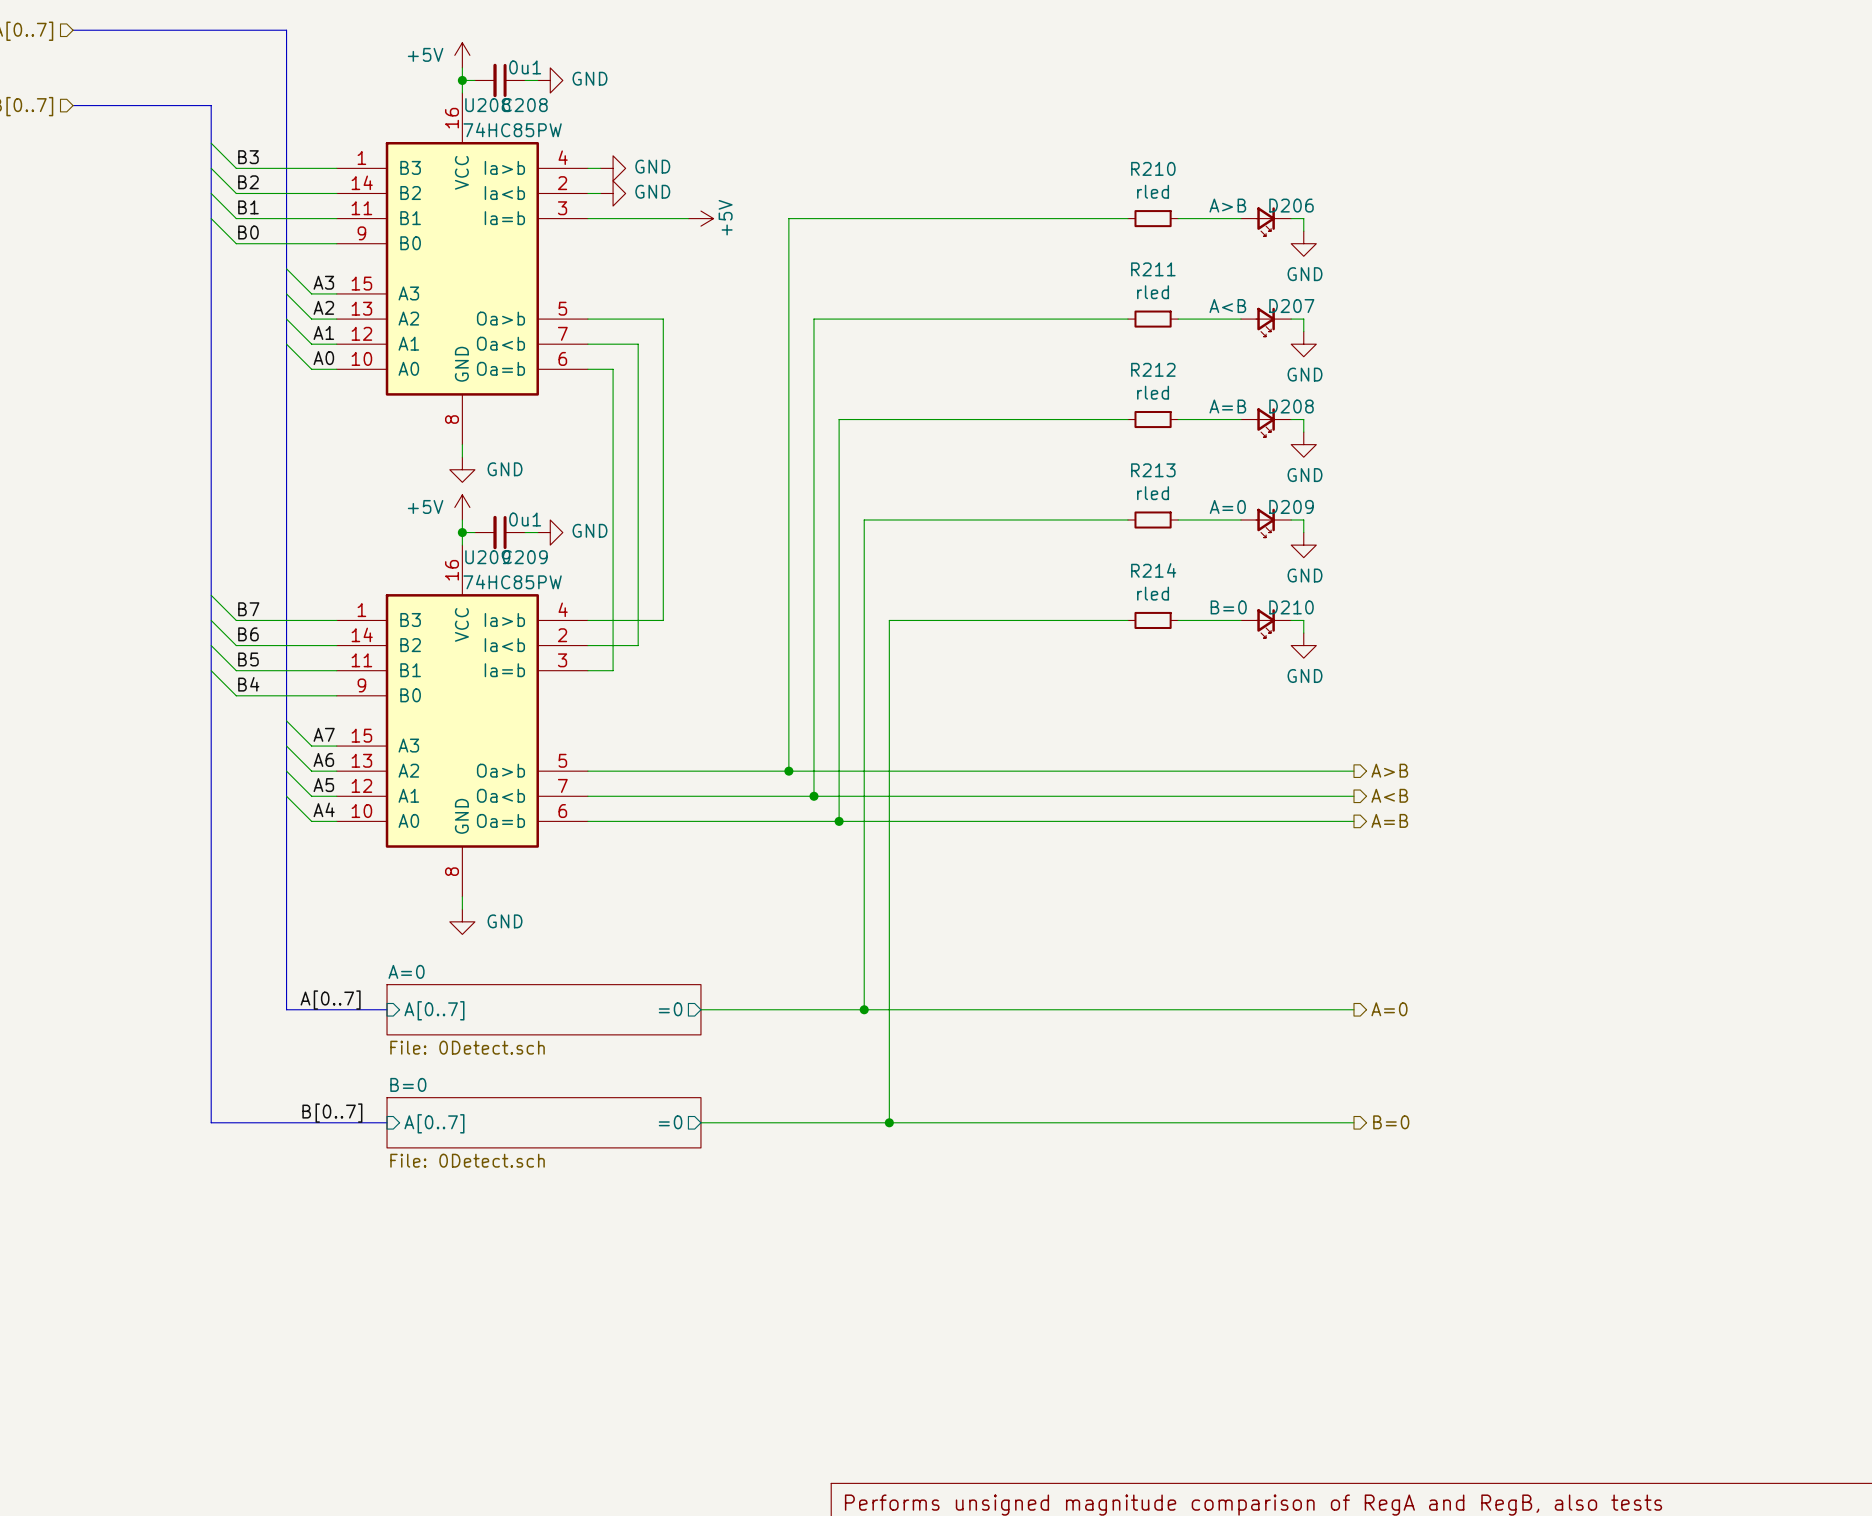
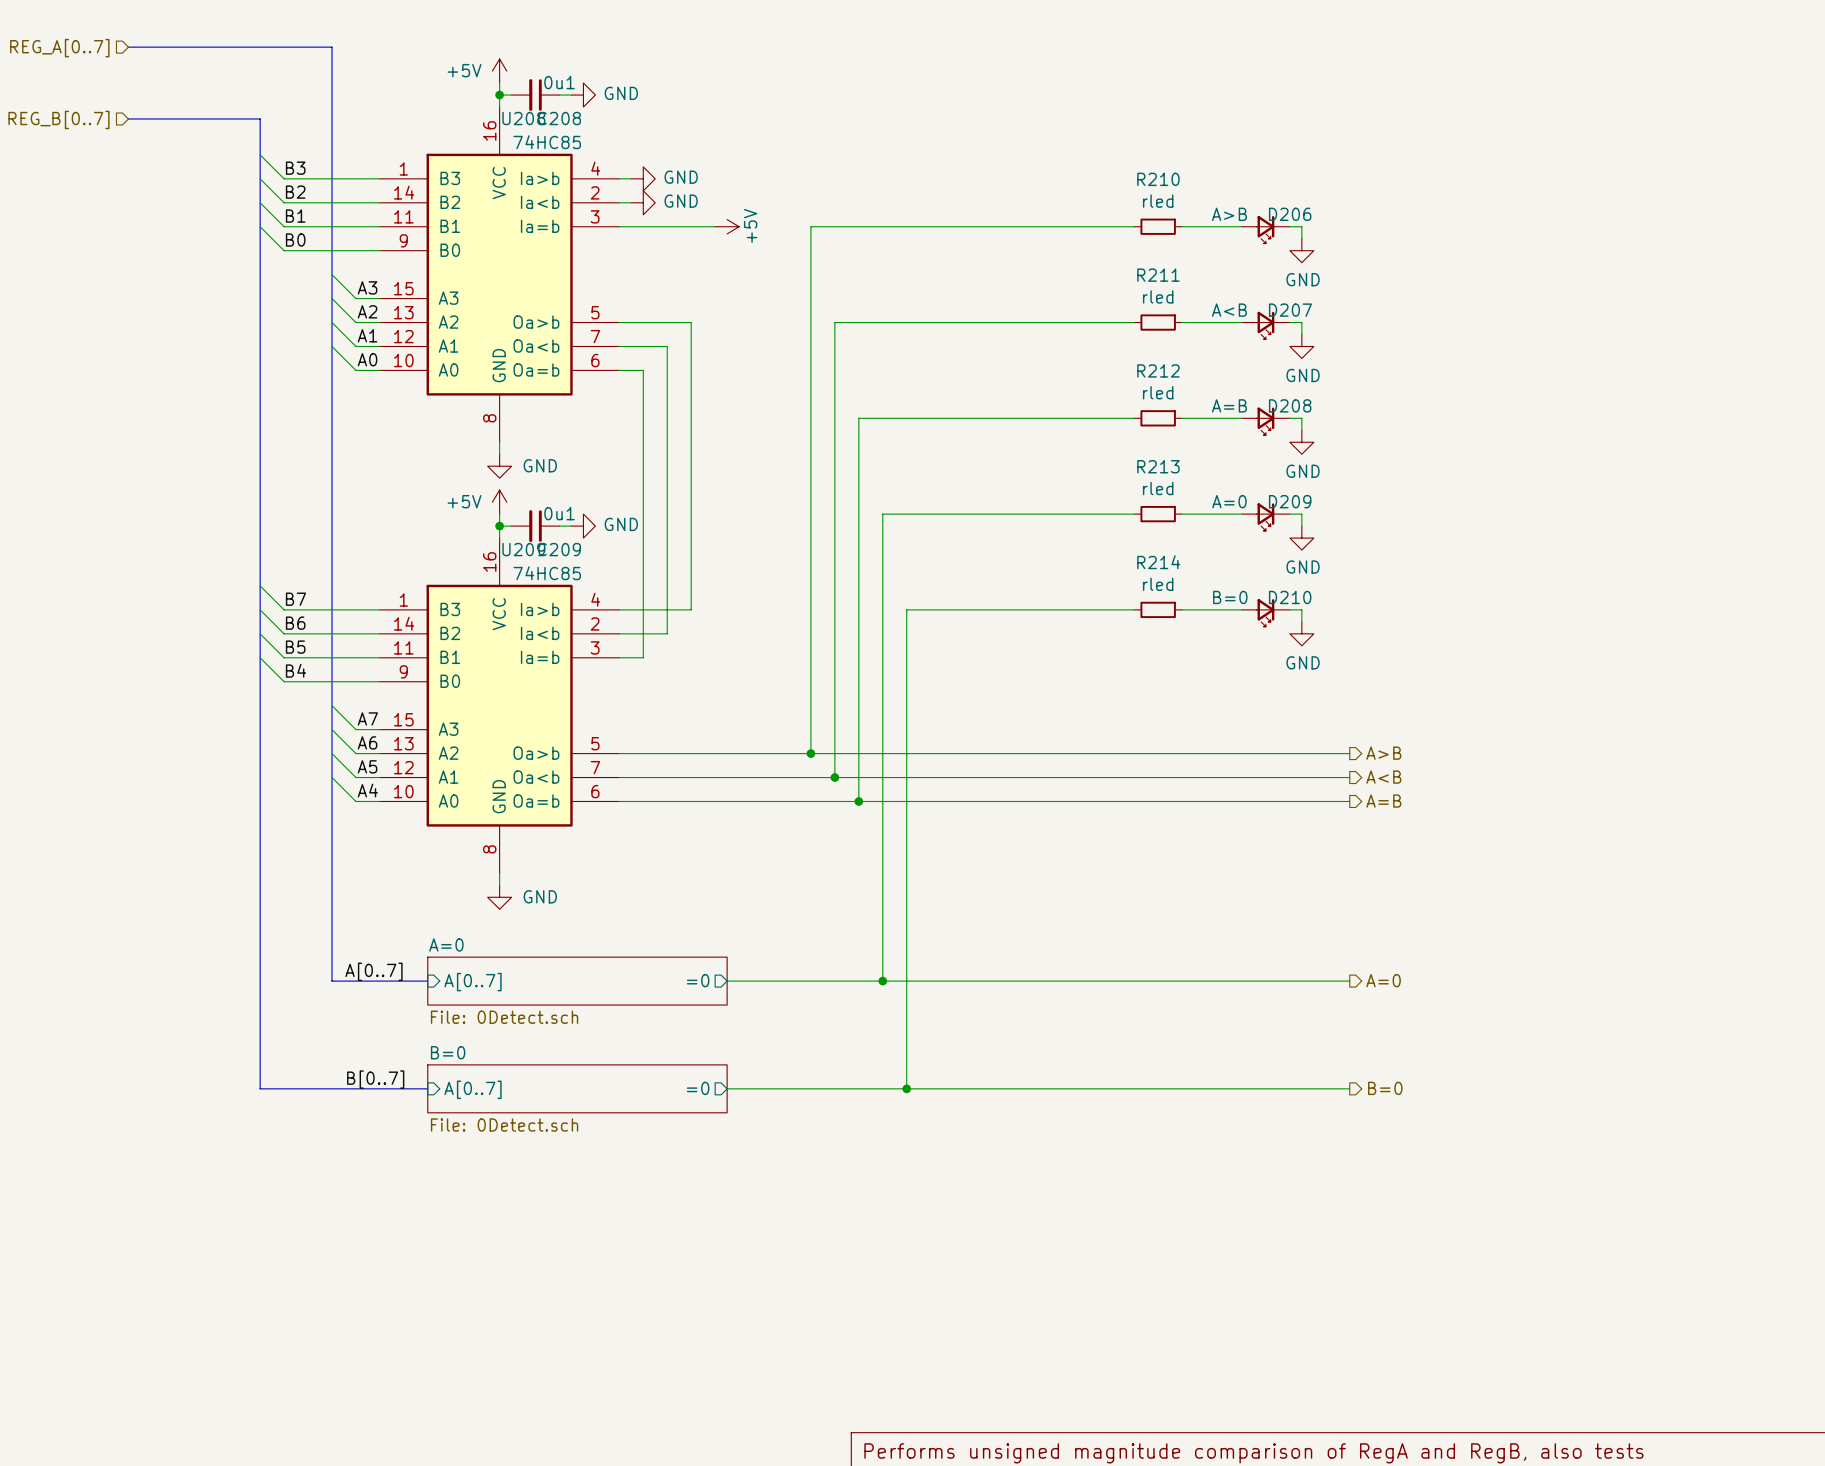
U208 value: 74HC85PW (512, 129) -> 74HC85 (547, 142)
U209 value: 74HC85PW (512, 582) -> 74HC85 (547, 573)

